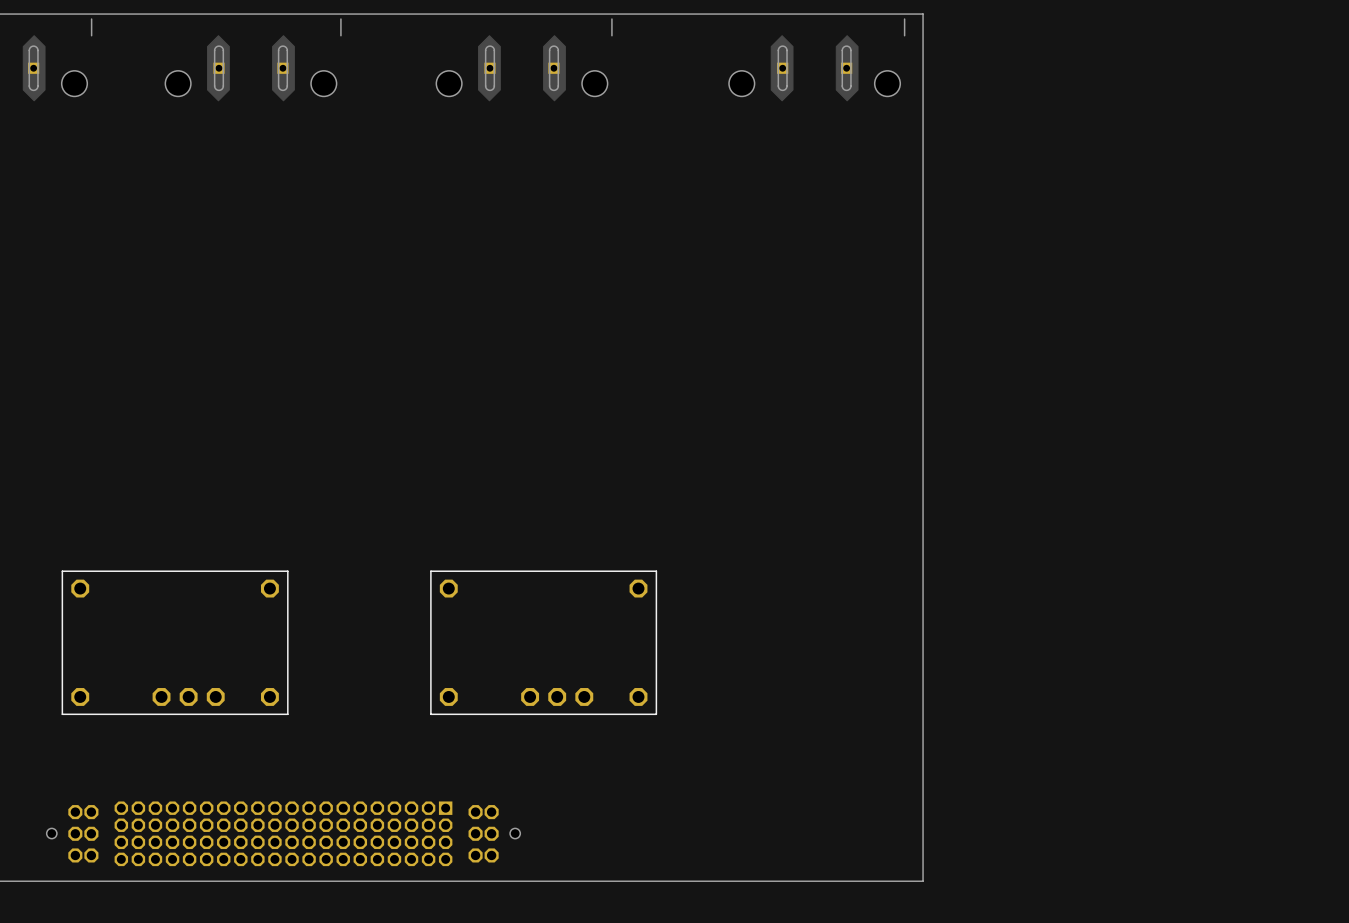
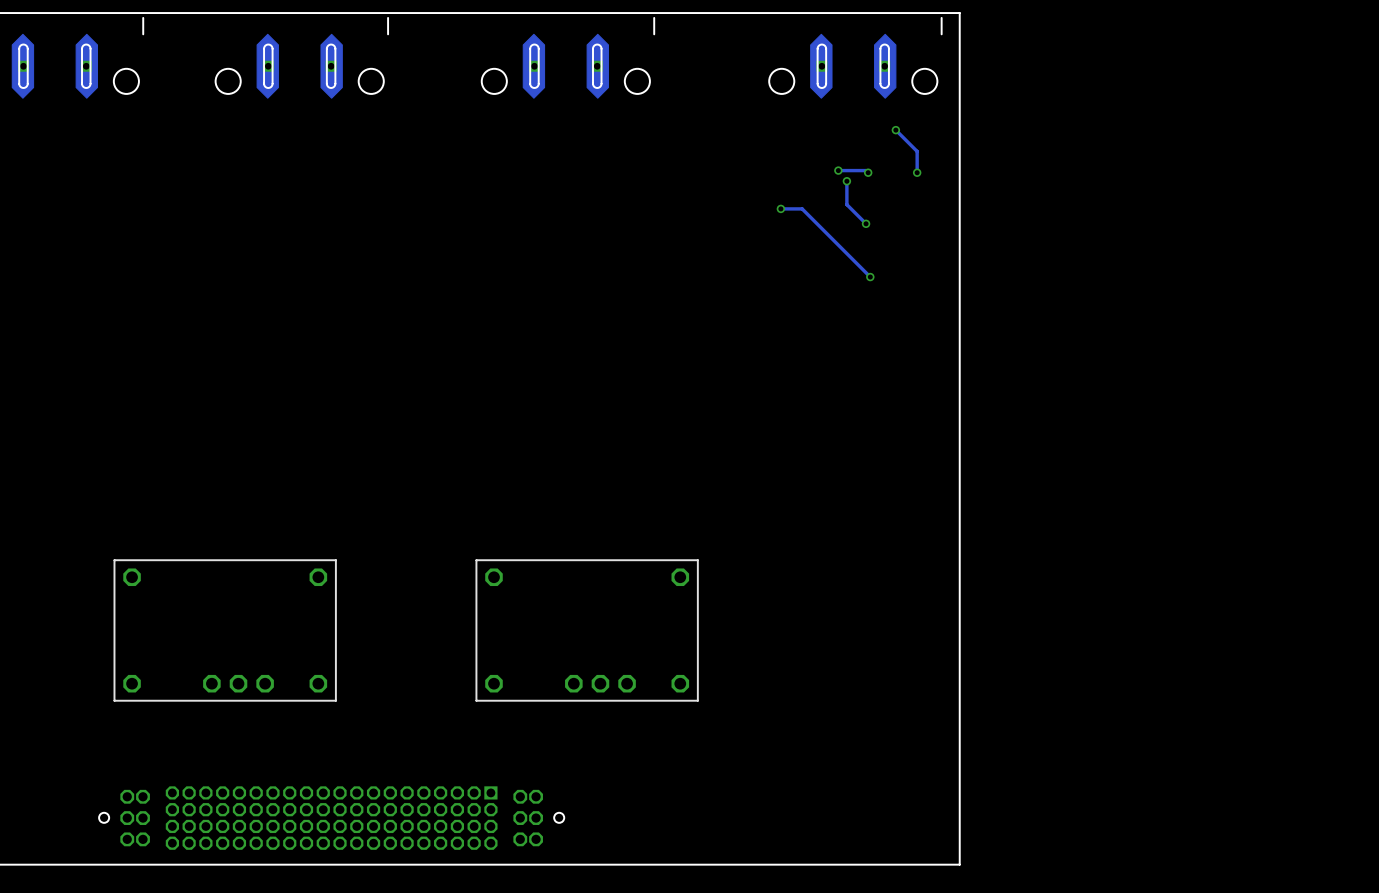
track: none -> (895, 130) (917, 151) (917, 172)
via: none -> (895, 130)
track: none -> (838, 170) (866, 170) (868, 172)
via: none -> (838, 170)
via: none -> (868, 172)
via: none -> (917, 172)
track: none -> (846, 181) (846, 204) (866, 223)
via: none -> (846, 181)
track: none -> (780, 208) (802, 208) (870, 277)
via: none -> (780, 208)
via: none -> (866, 223)
via: none -> (870, 277)

